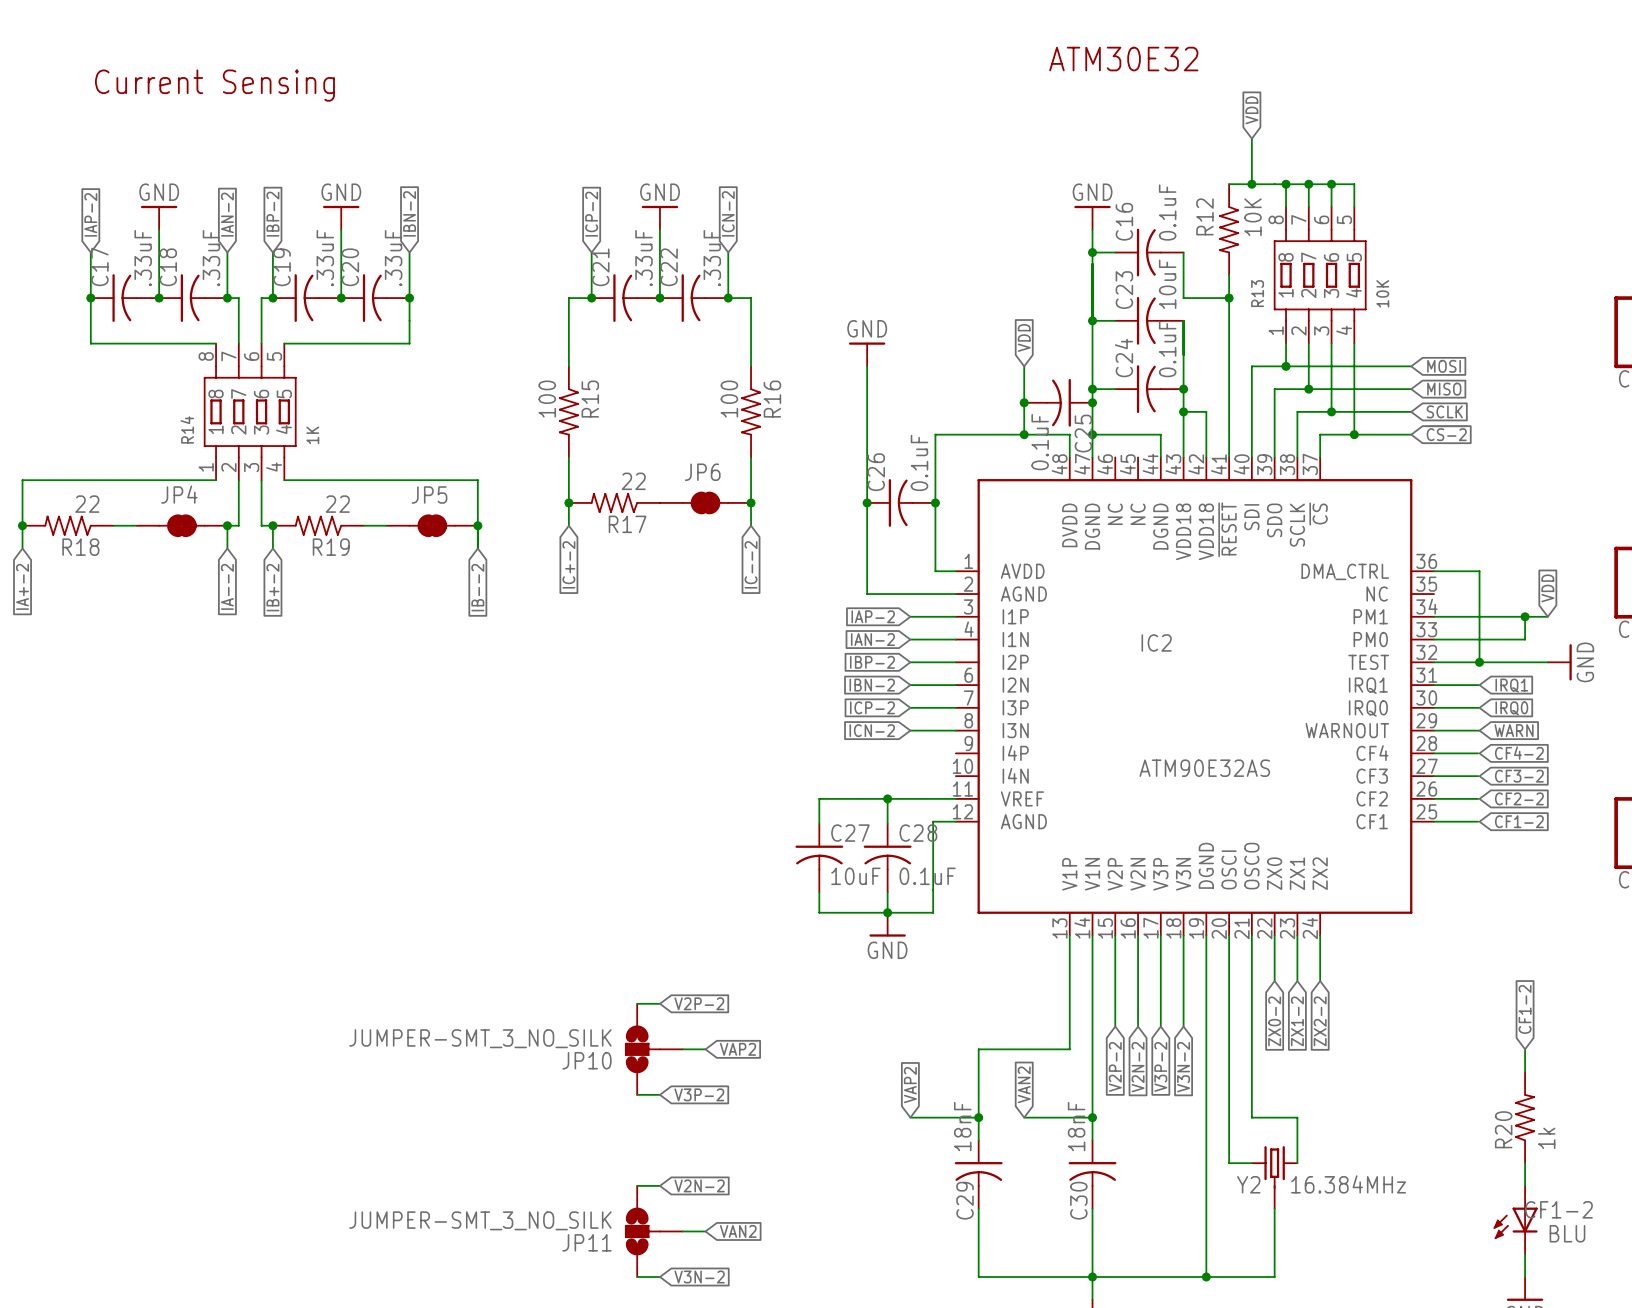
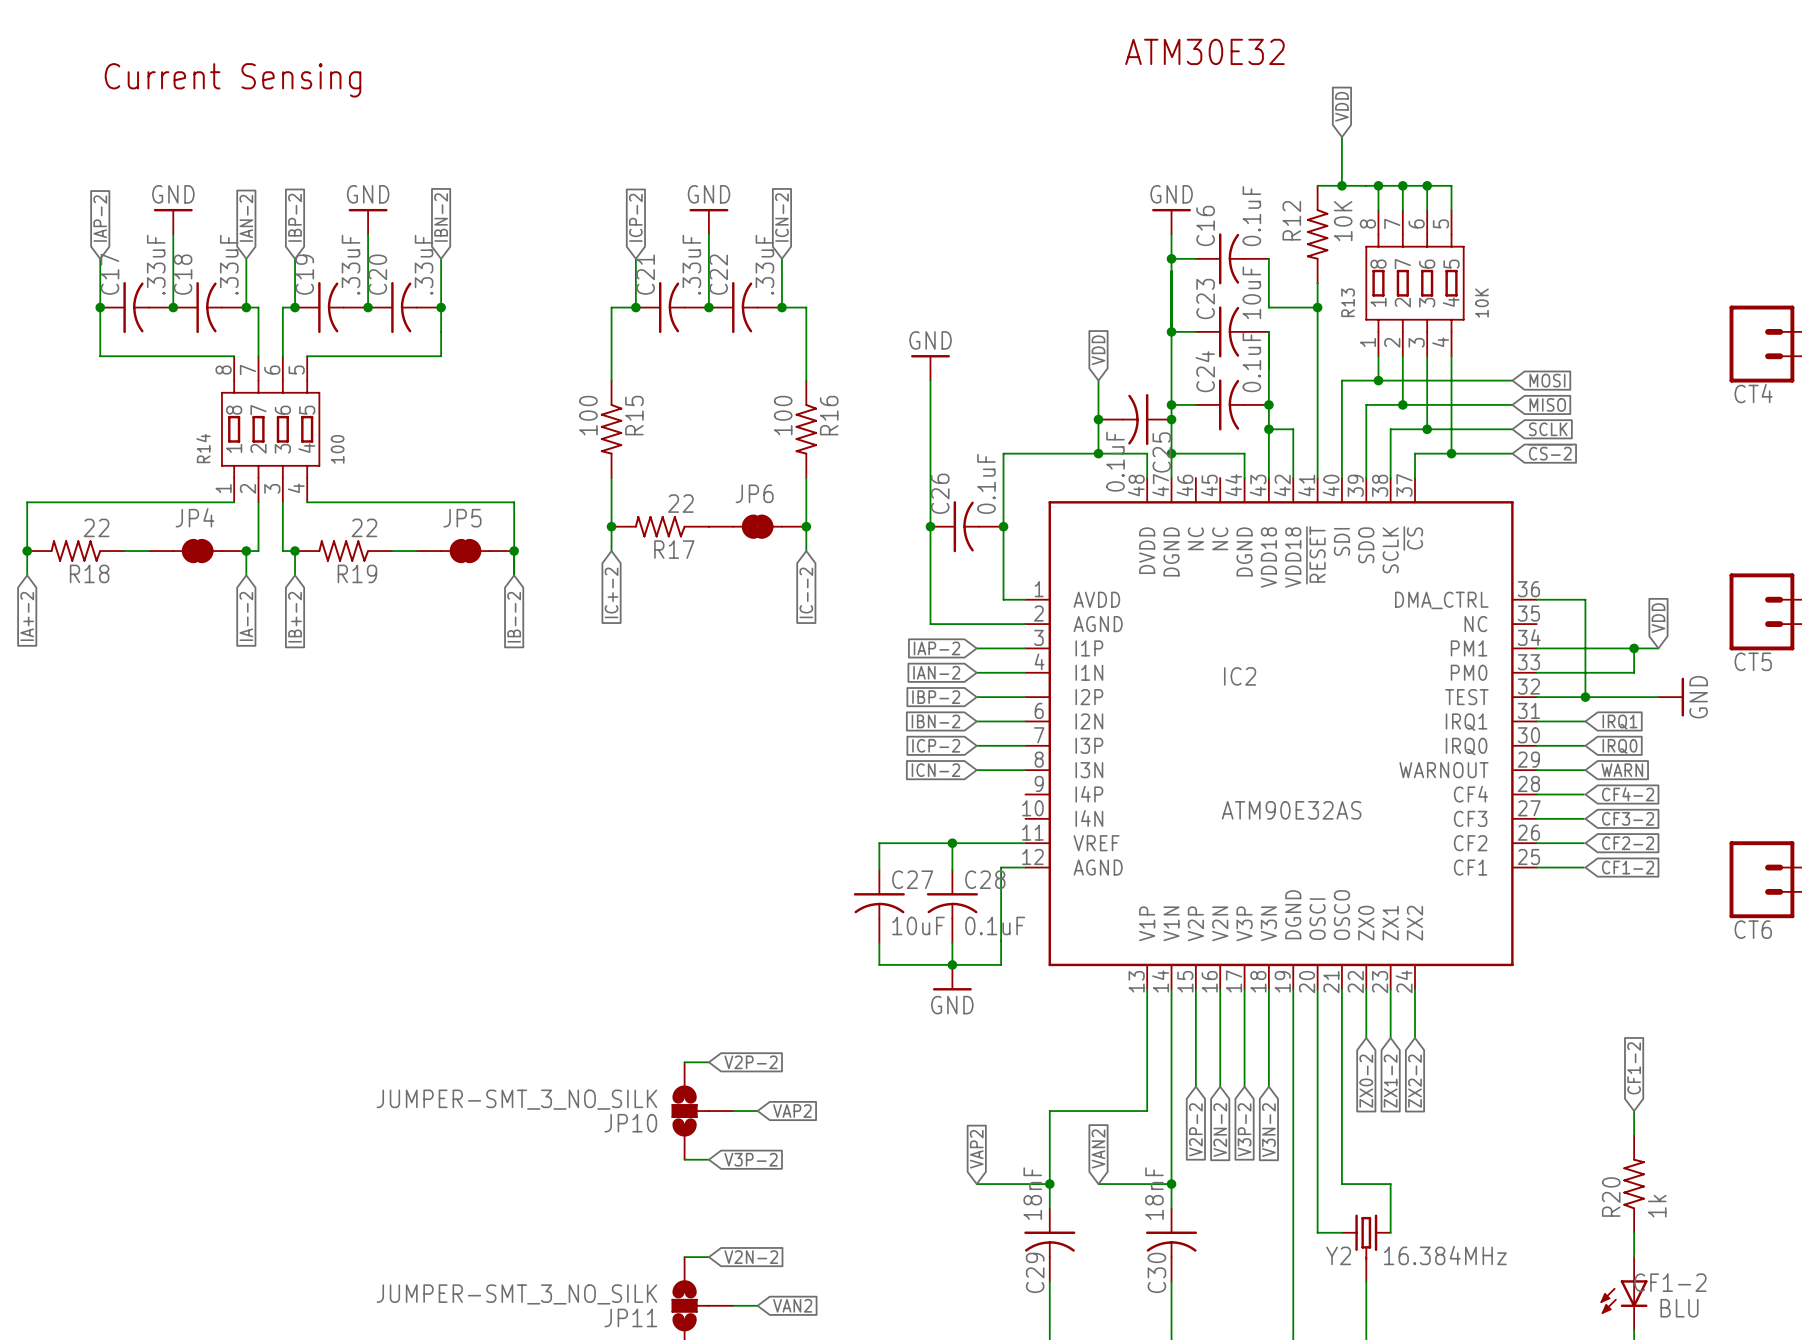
R14 value: 1K (312, 435) -> 100 (337, 449)

